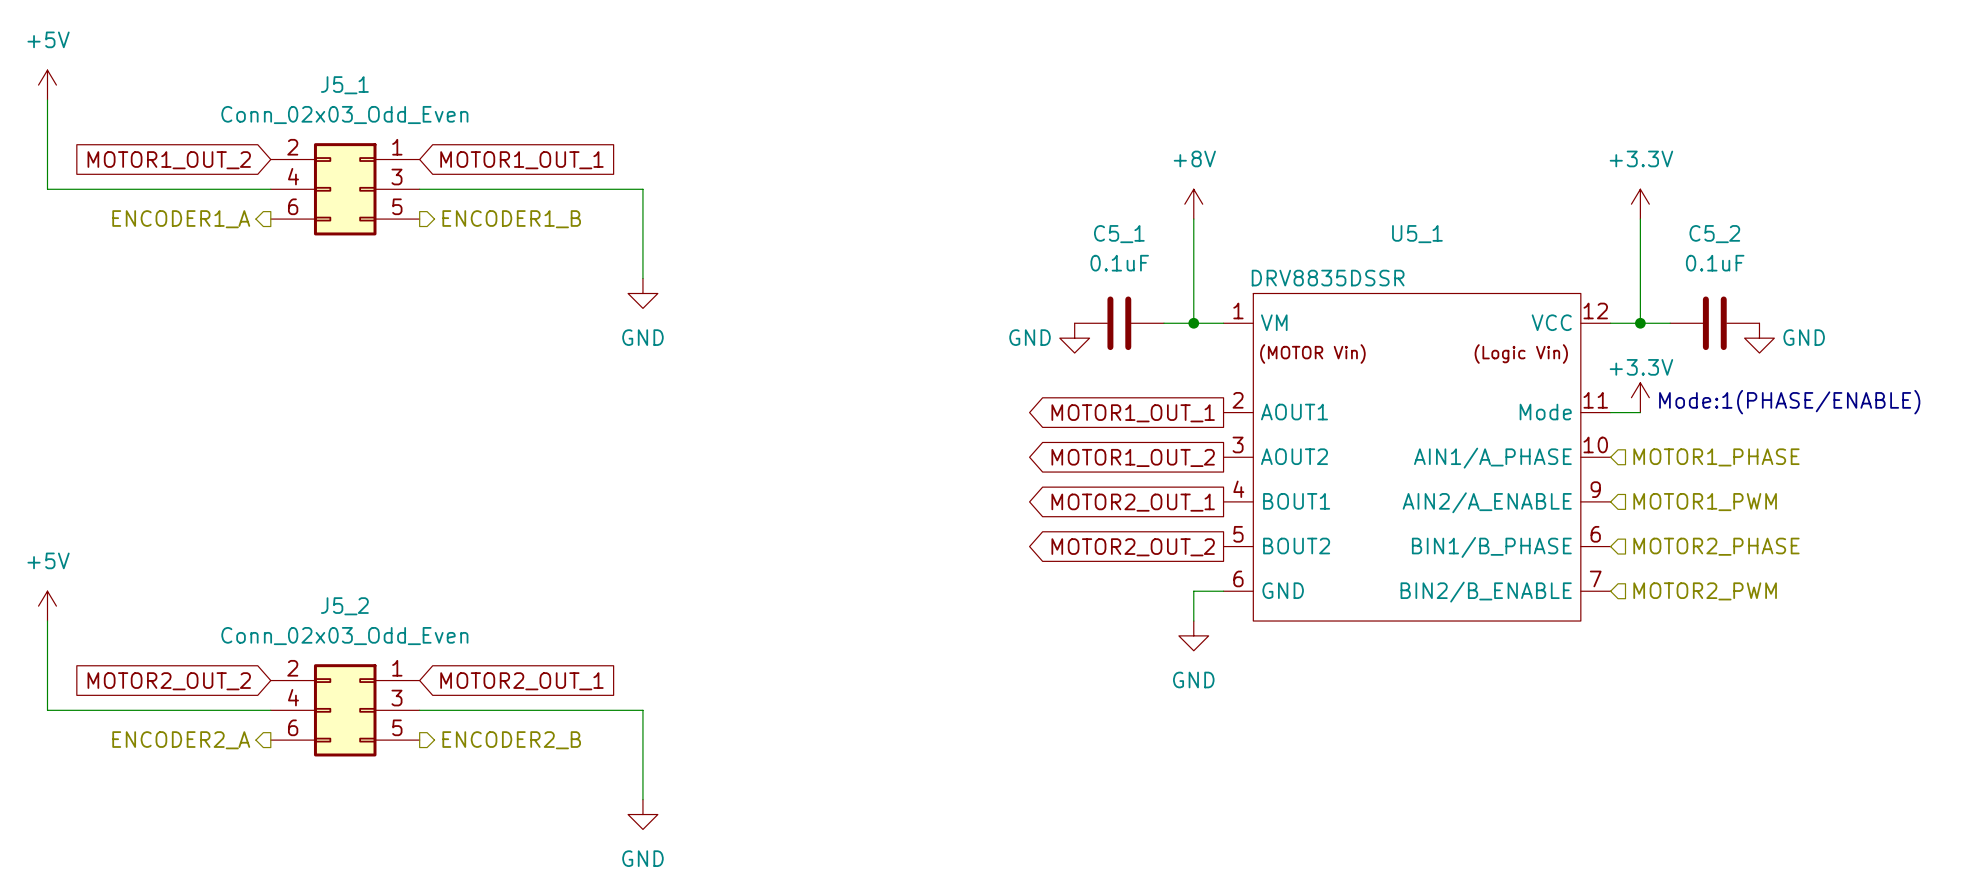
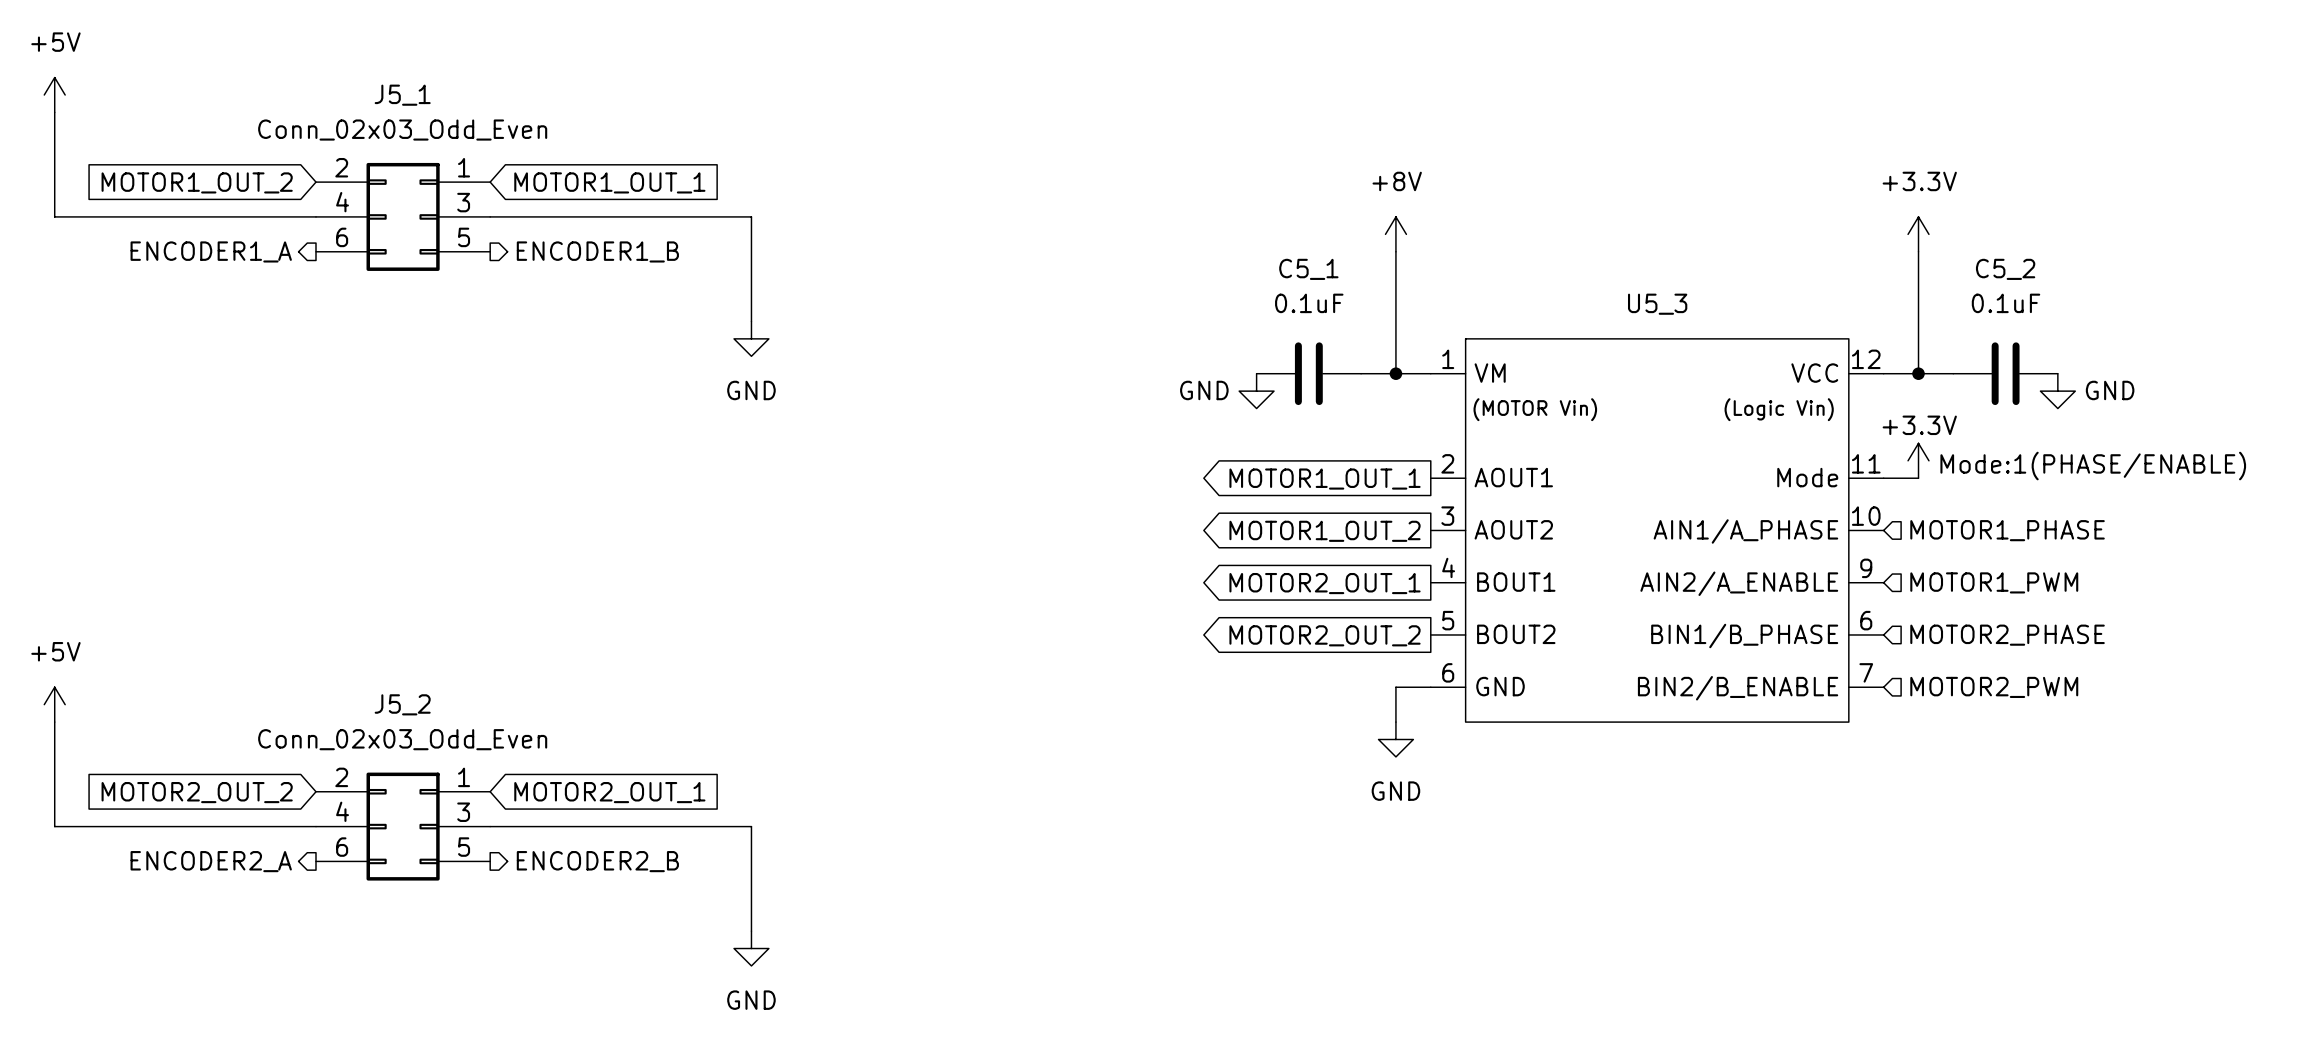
U5_1 name: U5_1 (1417, 234) -> U5_3 (1657, 304)
U5_1 value: DRV8835DSSR (1328, 278) -> none

